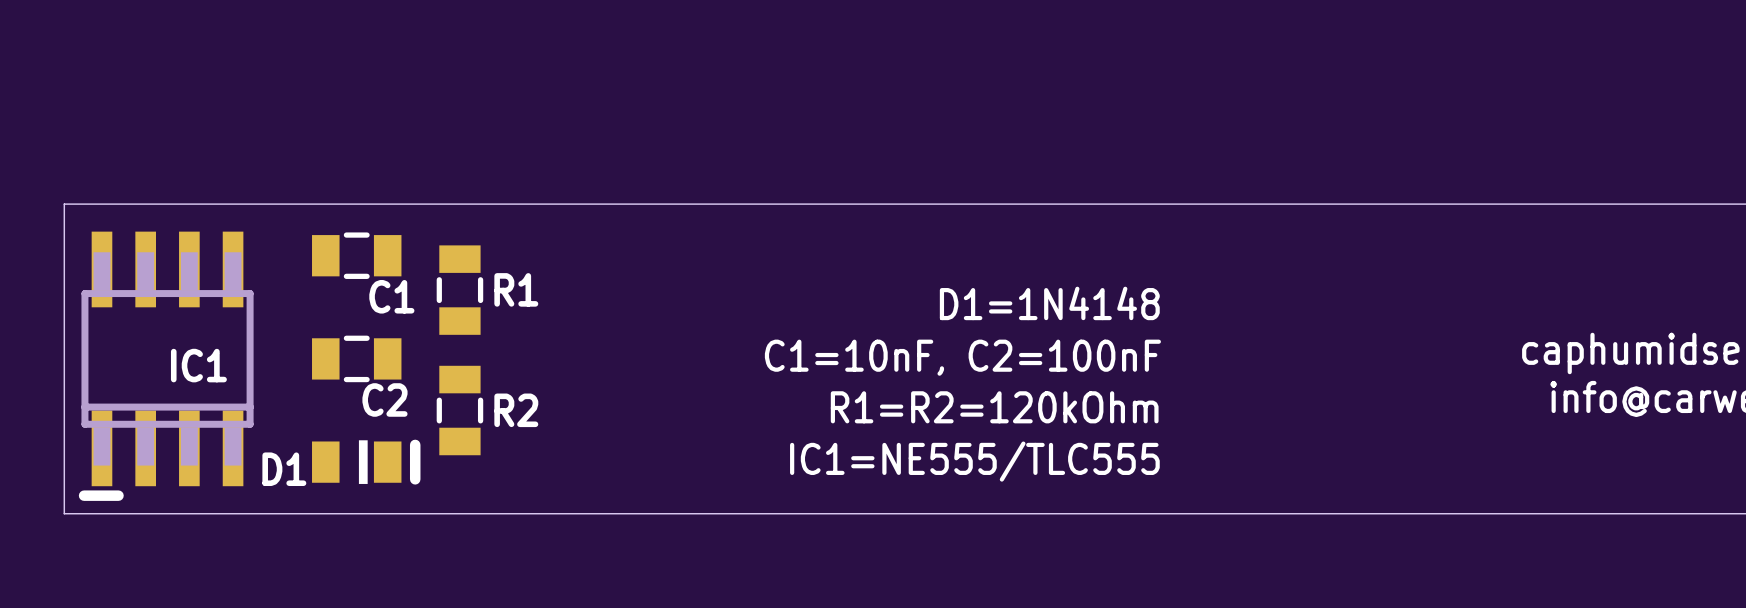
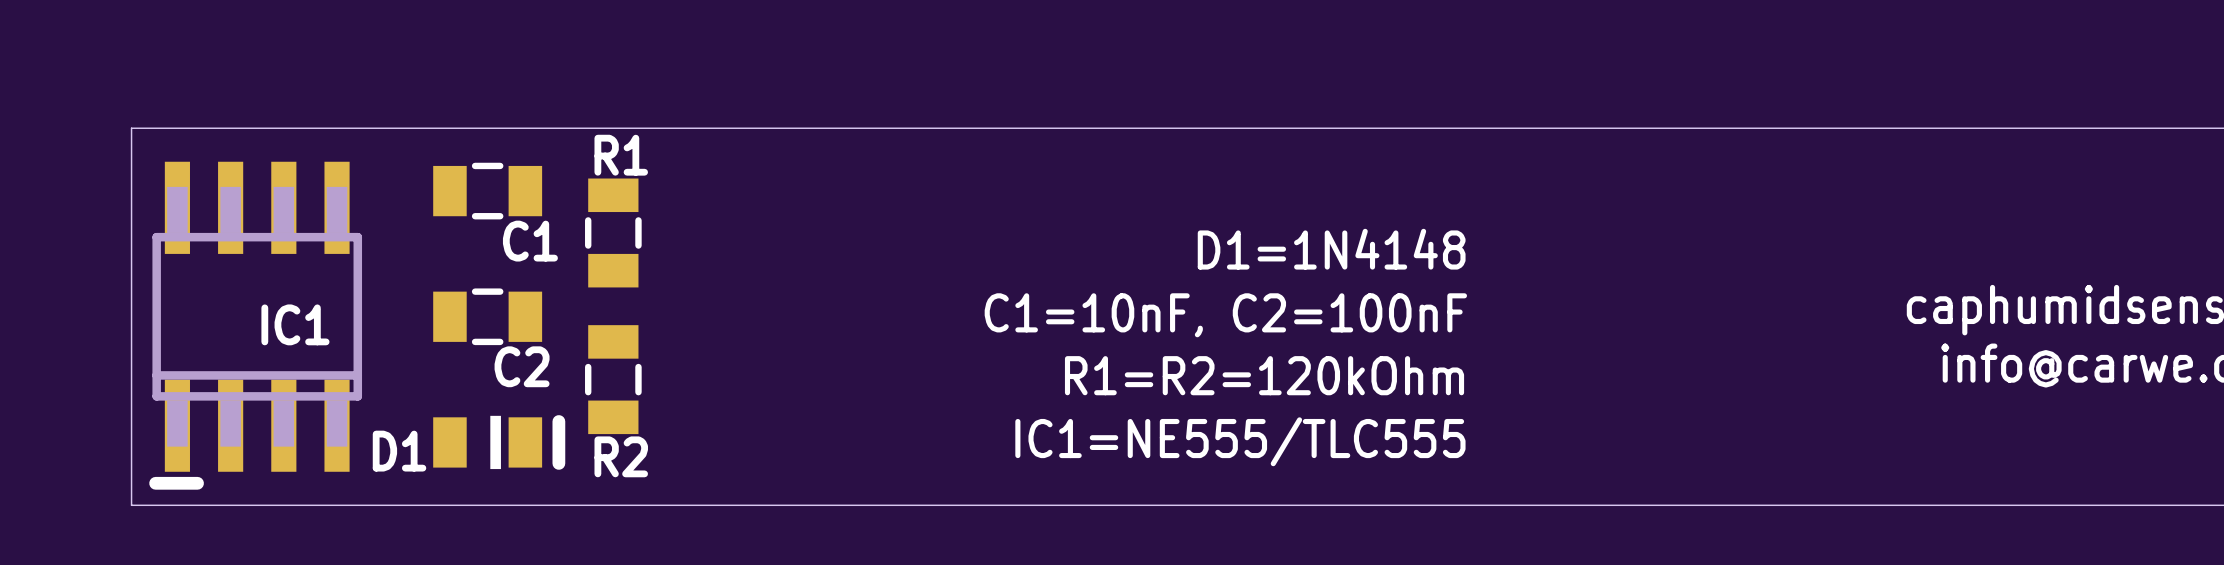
text position: R1 (516, 289) -> R1 (621, 155)
text position: R2 (516, 410) -> R2 (621, 456)

